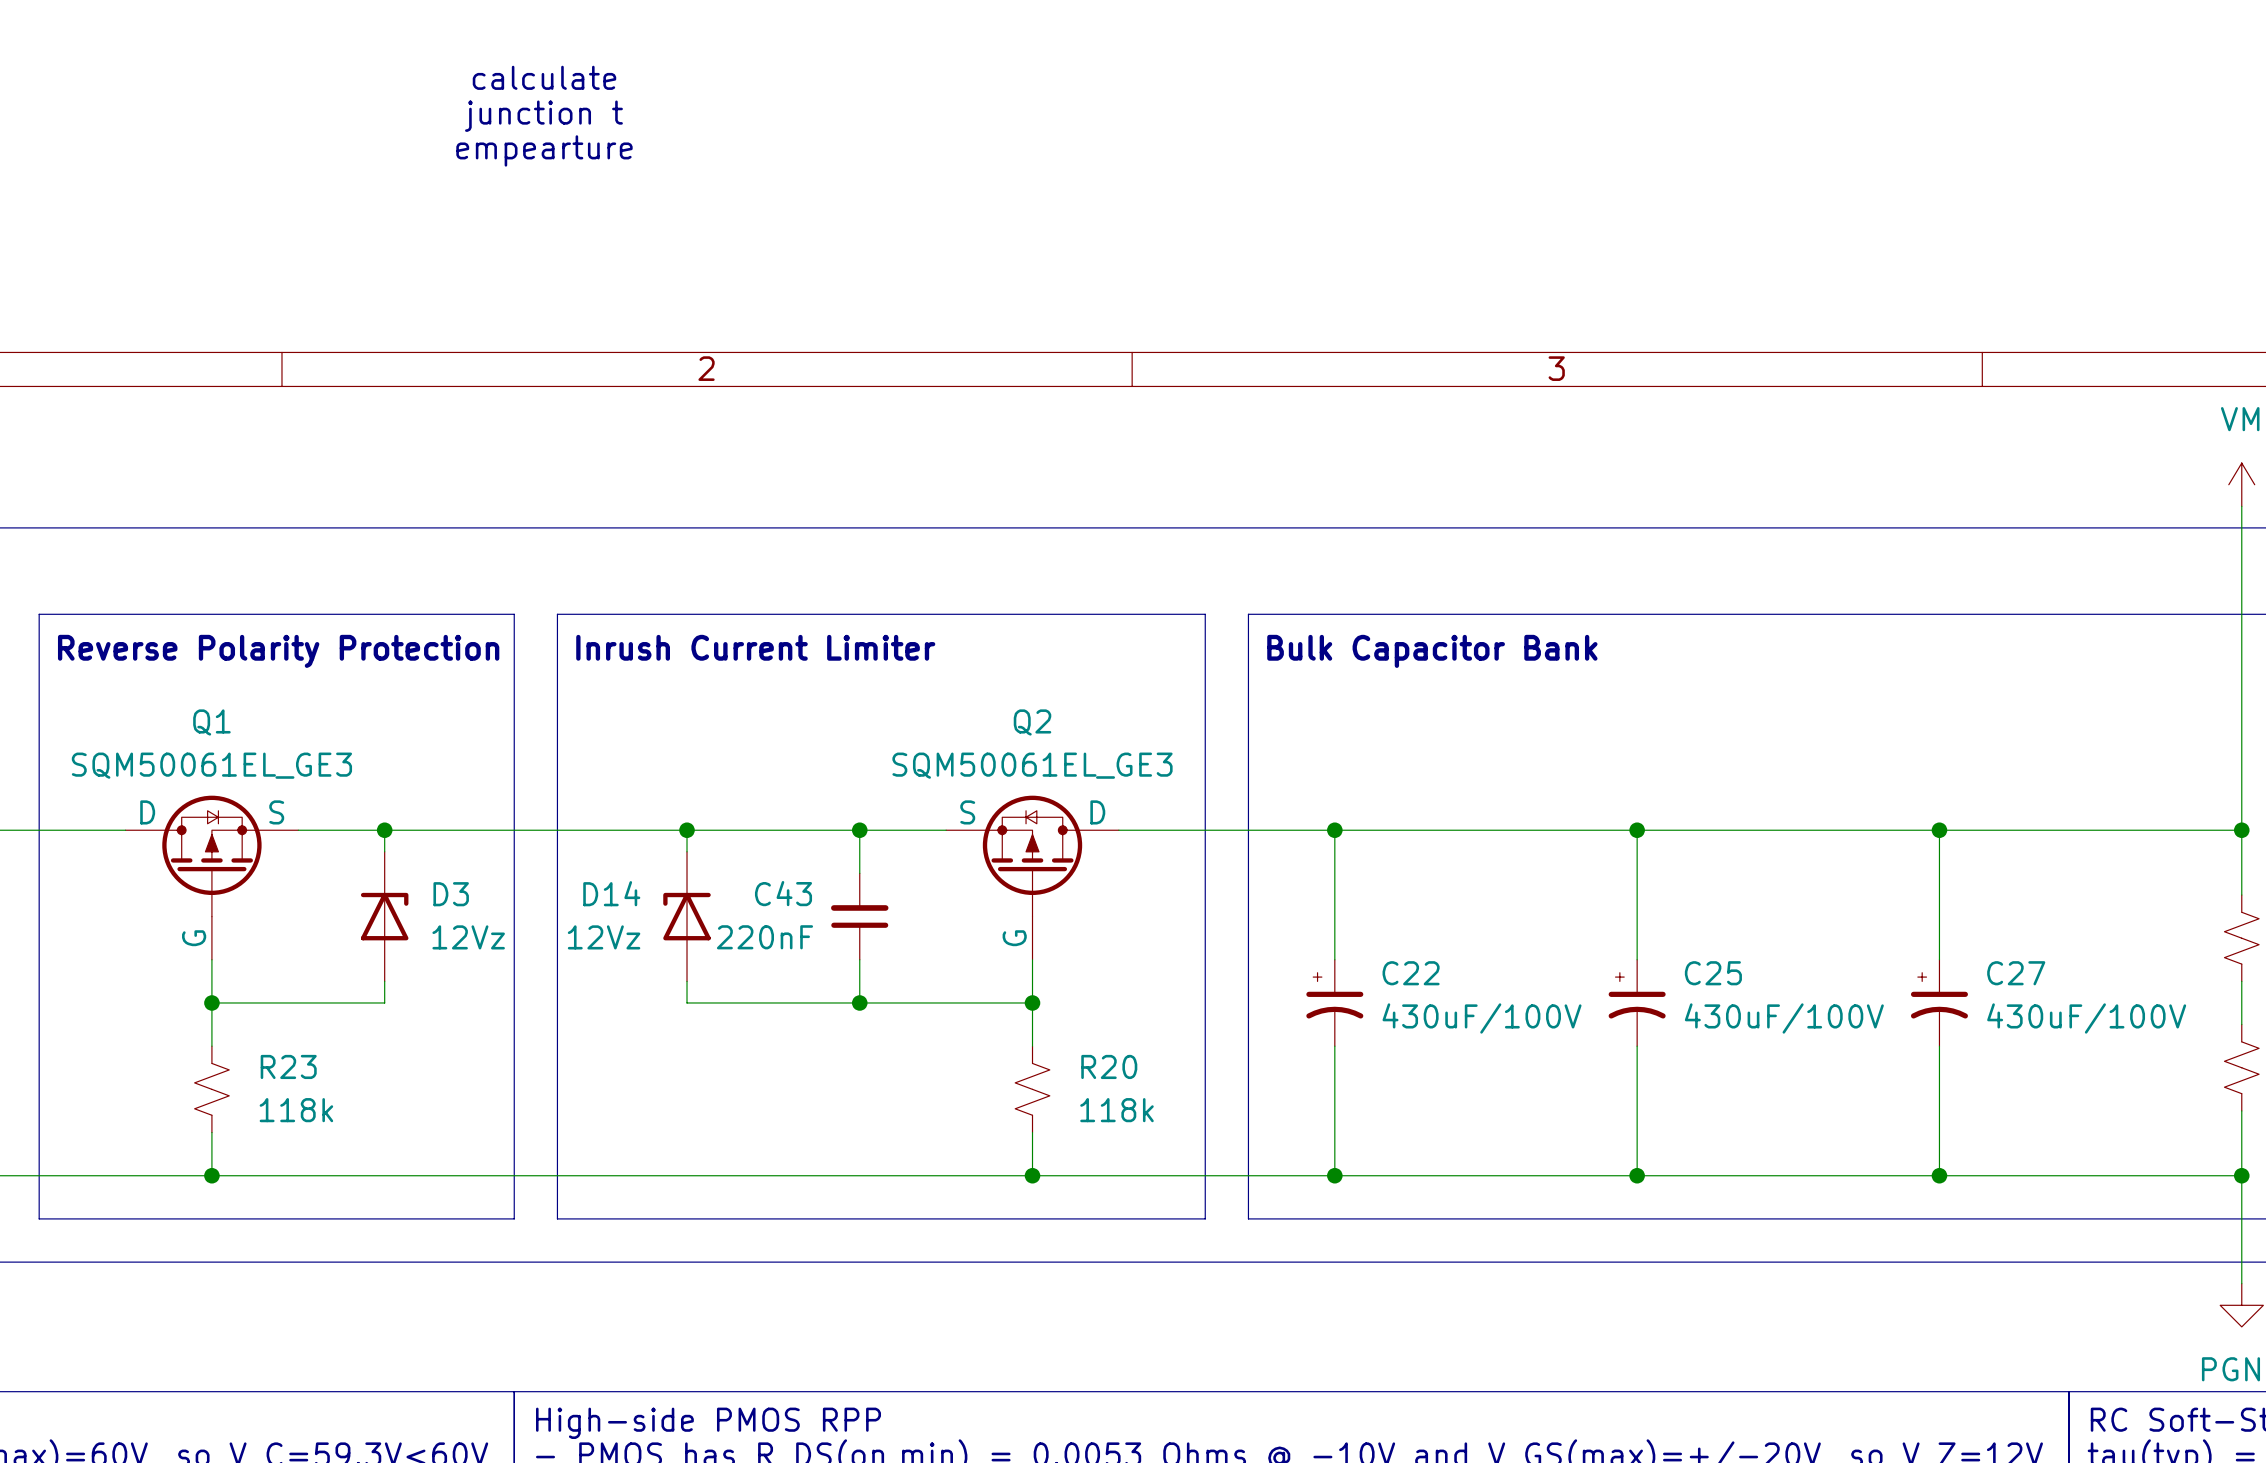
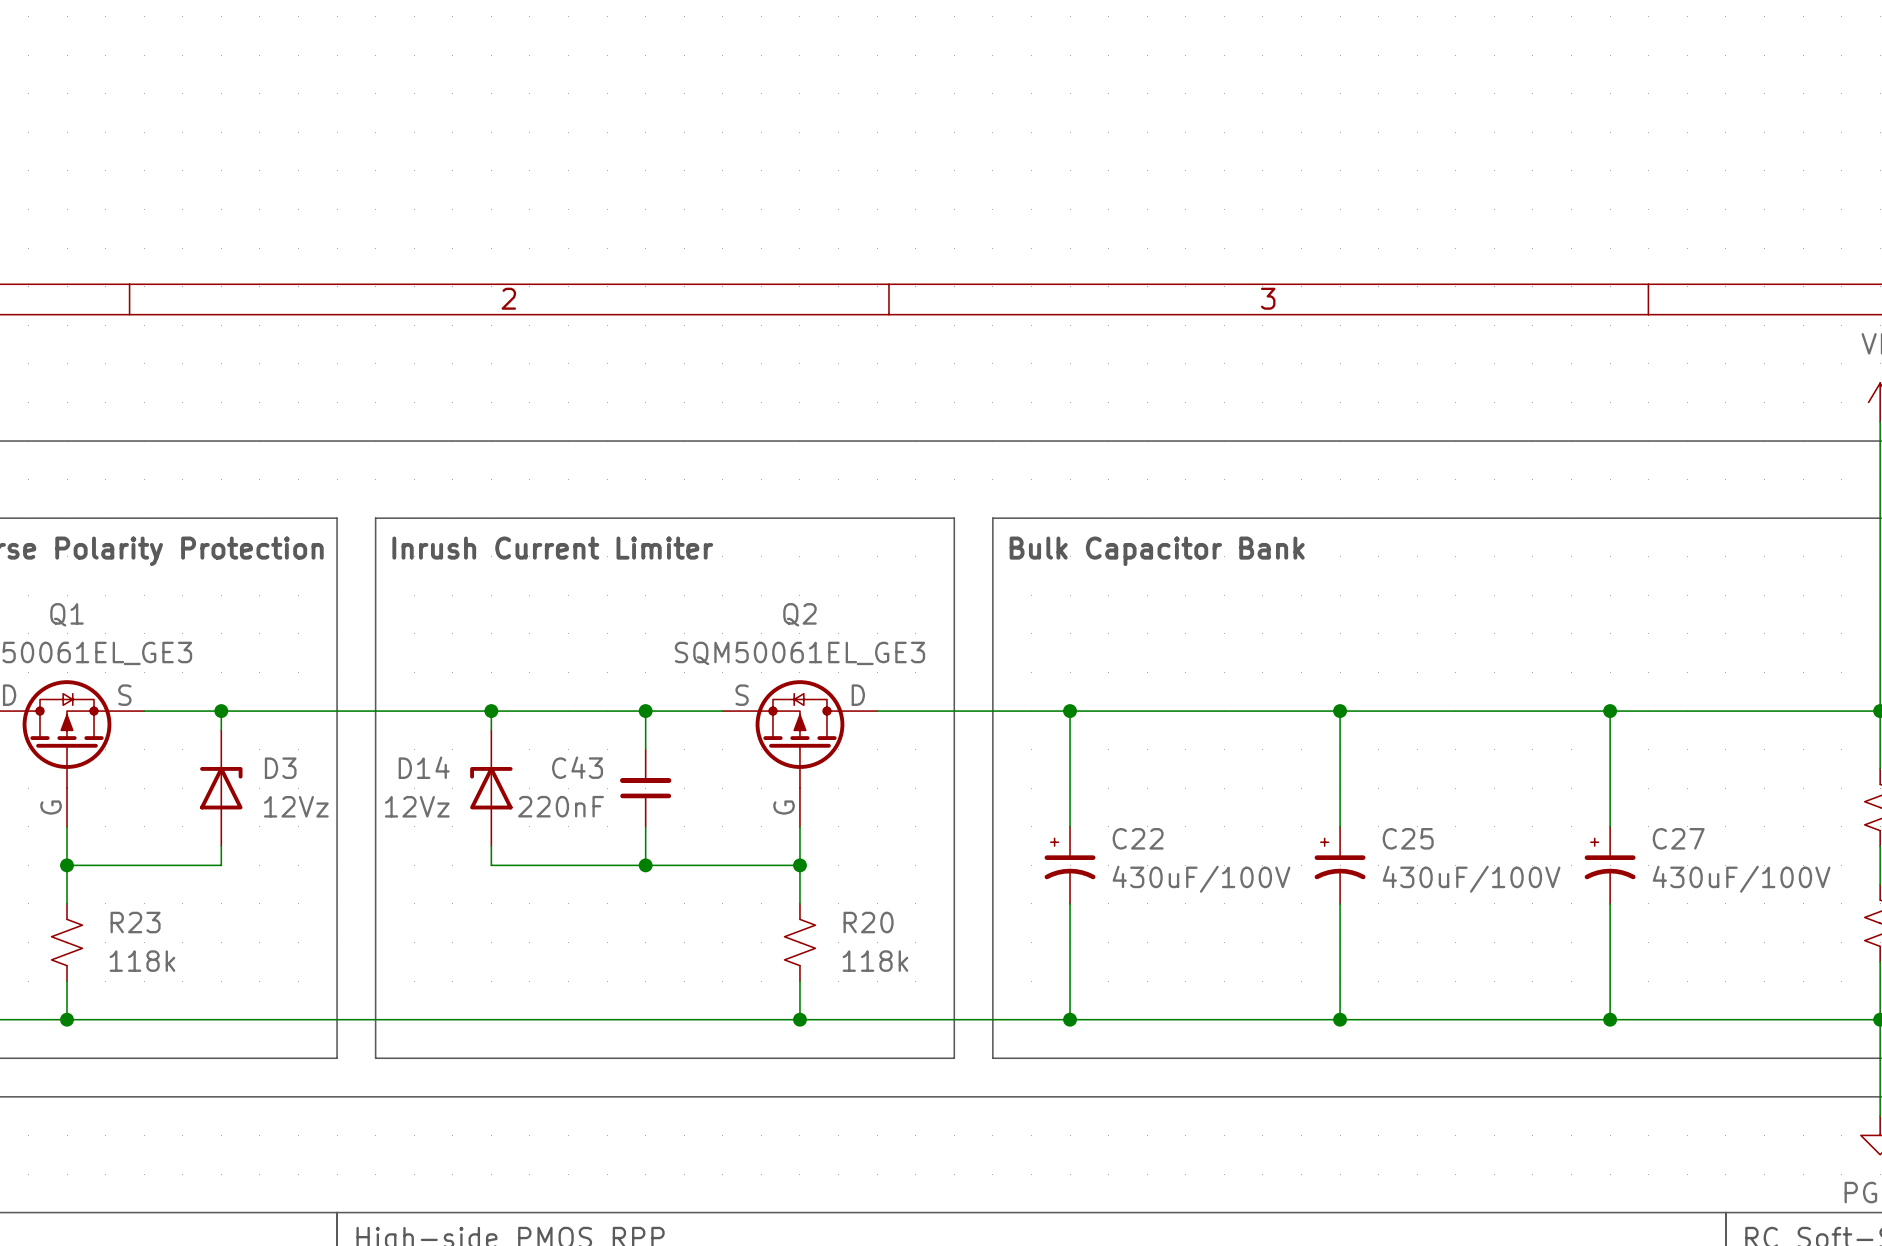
text: calculate (544, 77) -> none
text: junction t (543, 116) -> none
text: empearture (544, 150) -> none

